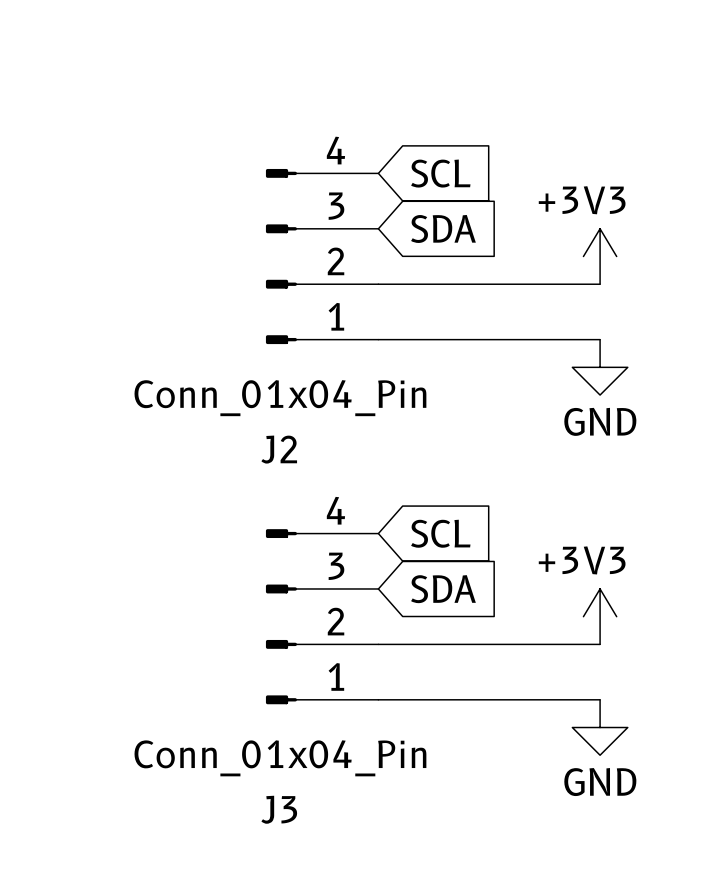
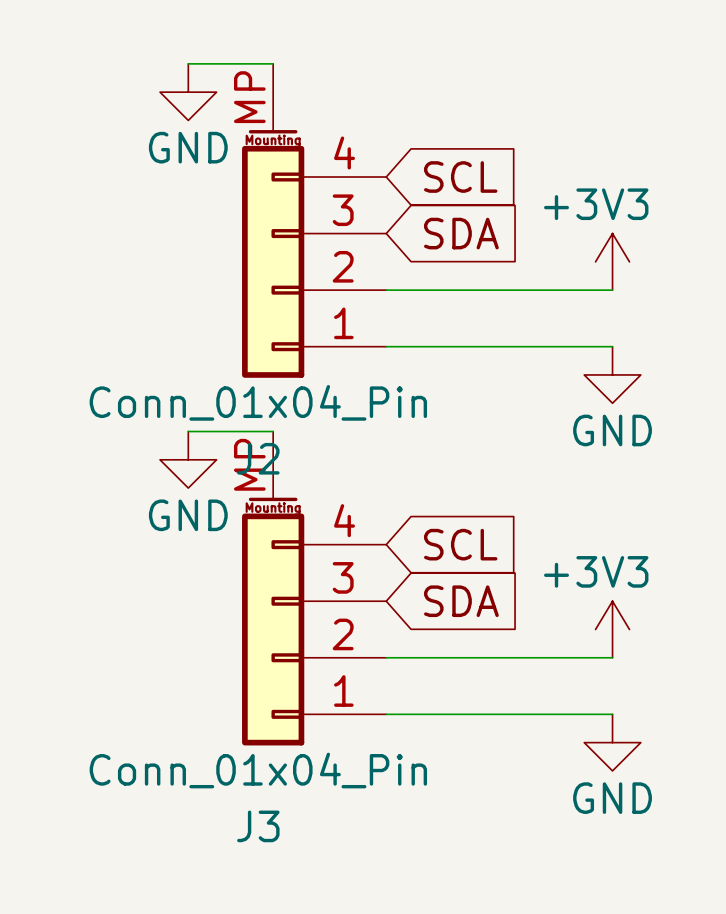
wire: none -> (188, 63) (273, 63)
power symbol: none -> GND (188, 92)
J2 symbol: [265, 168, 379, 345] -> [242, 63, 387, 378]
wire: none -> (188, 431) (273, 431)
power symbol: none -> GND (188, 459)
J3 symbol: [265, 529, 379, 705] -> [242, 431, 387, 746]

